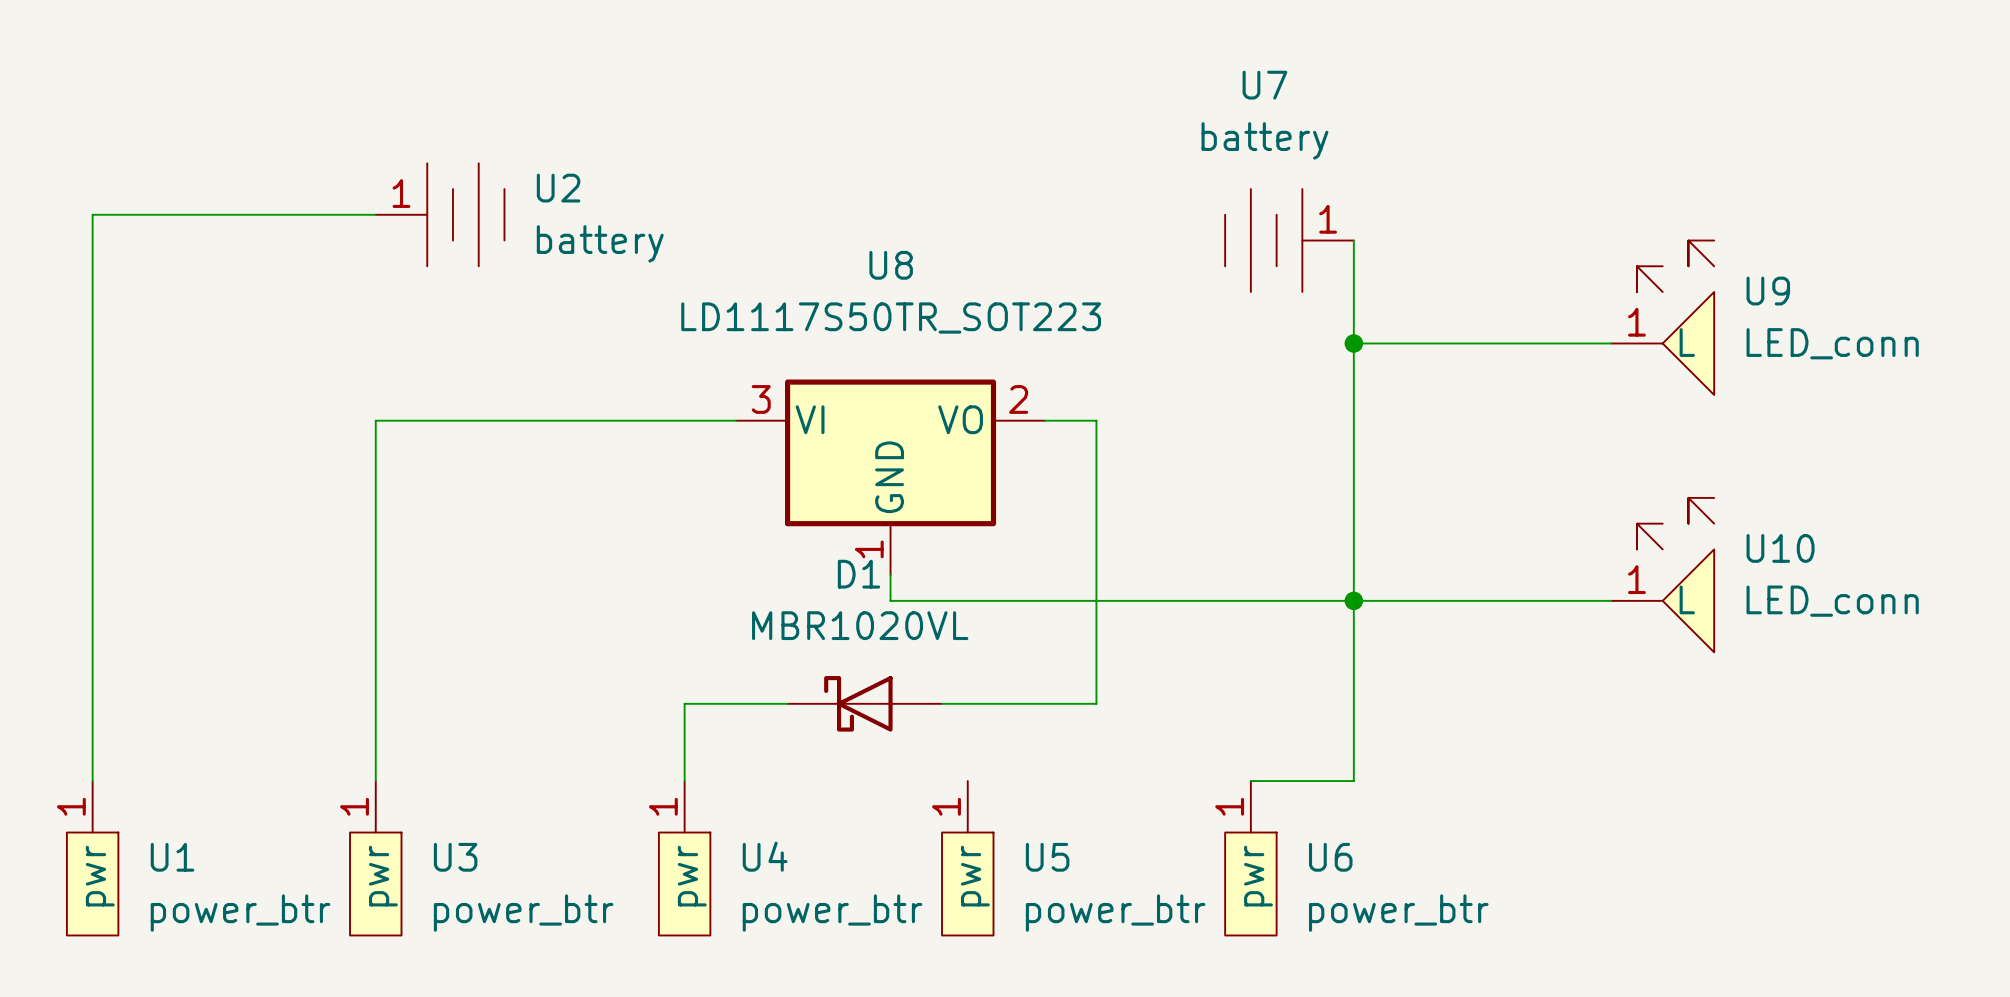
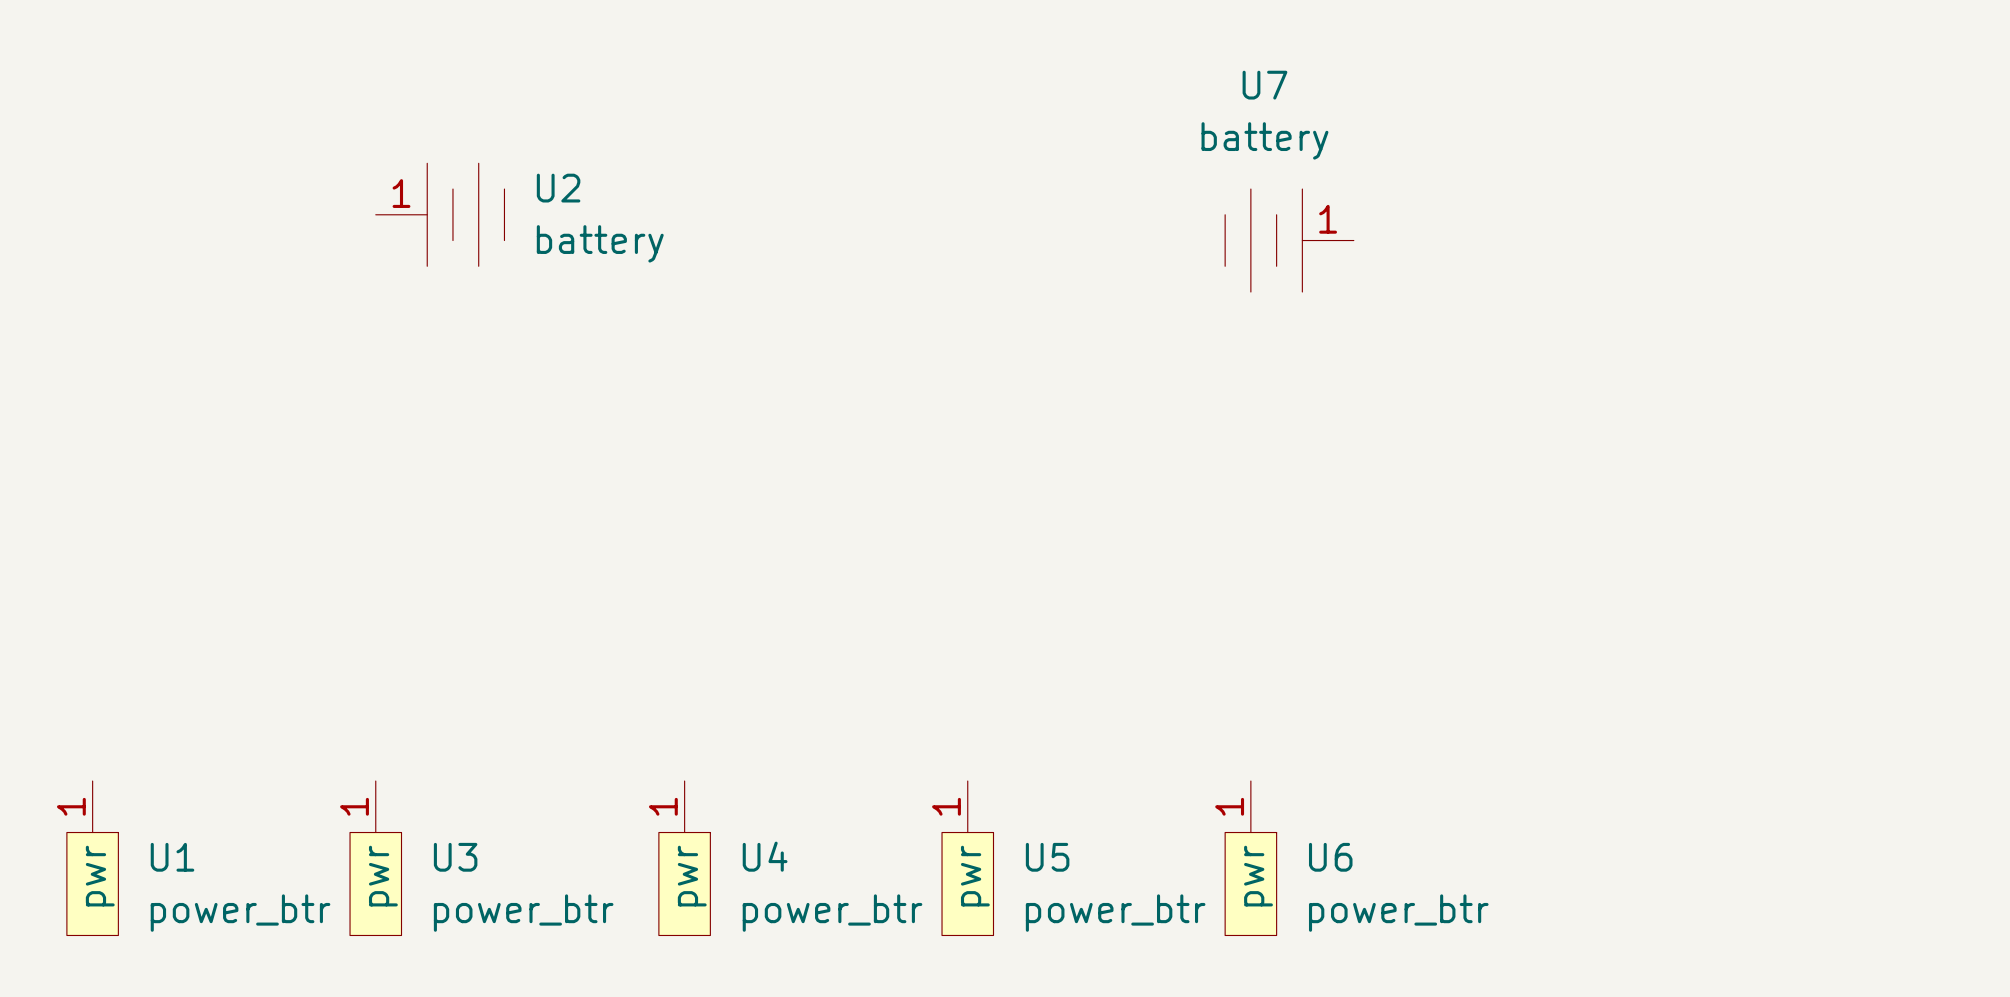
wire: (375, 214) (92, 214) (92, 781) -> none
wire: (1353, 240) (1353, 781) (1250, 781) -> none
U9: LED_conn (1662, 317) -> none
wire: (1353, 343) (1611, 343) -> none
junction: (1353, 343) -> none
wire: (736, 420) (375, 420) (375, 781) -> none
wire: (1044, 420) (1096, 420) (1096, 703) (942, 703) -> none
U8: LD1117S50TR_SOT223 (890, 477) -> none
wire: (890, 575) (890, 600) (1611, 600) -> none
U10: LED_conn (1662, 575) -> none
junction: (1353, 600) -> none
wire: (787, 703) (684, 703) (684, 781) -> none
D1: MBR1020VL (864, 703) -> none

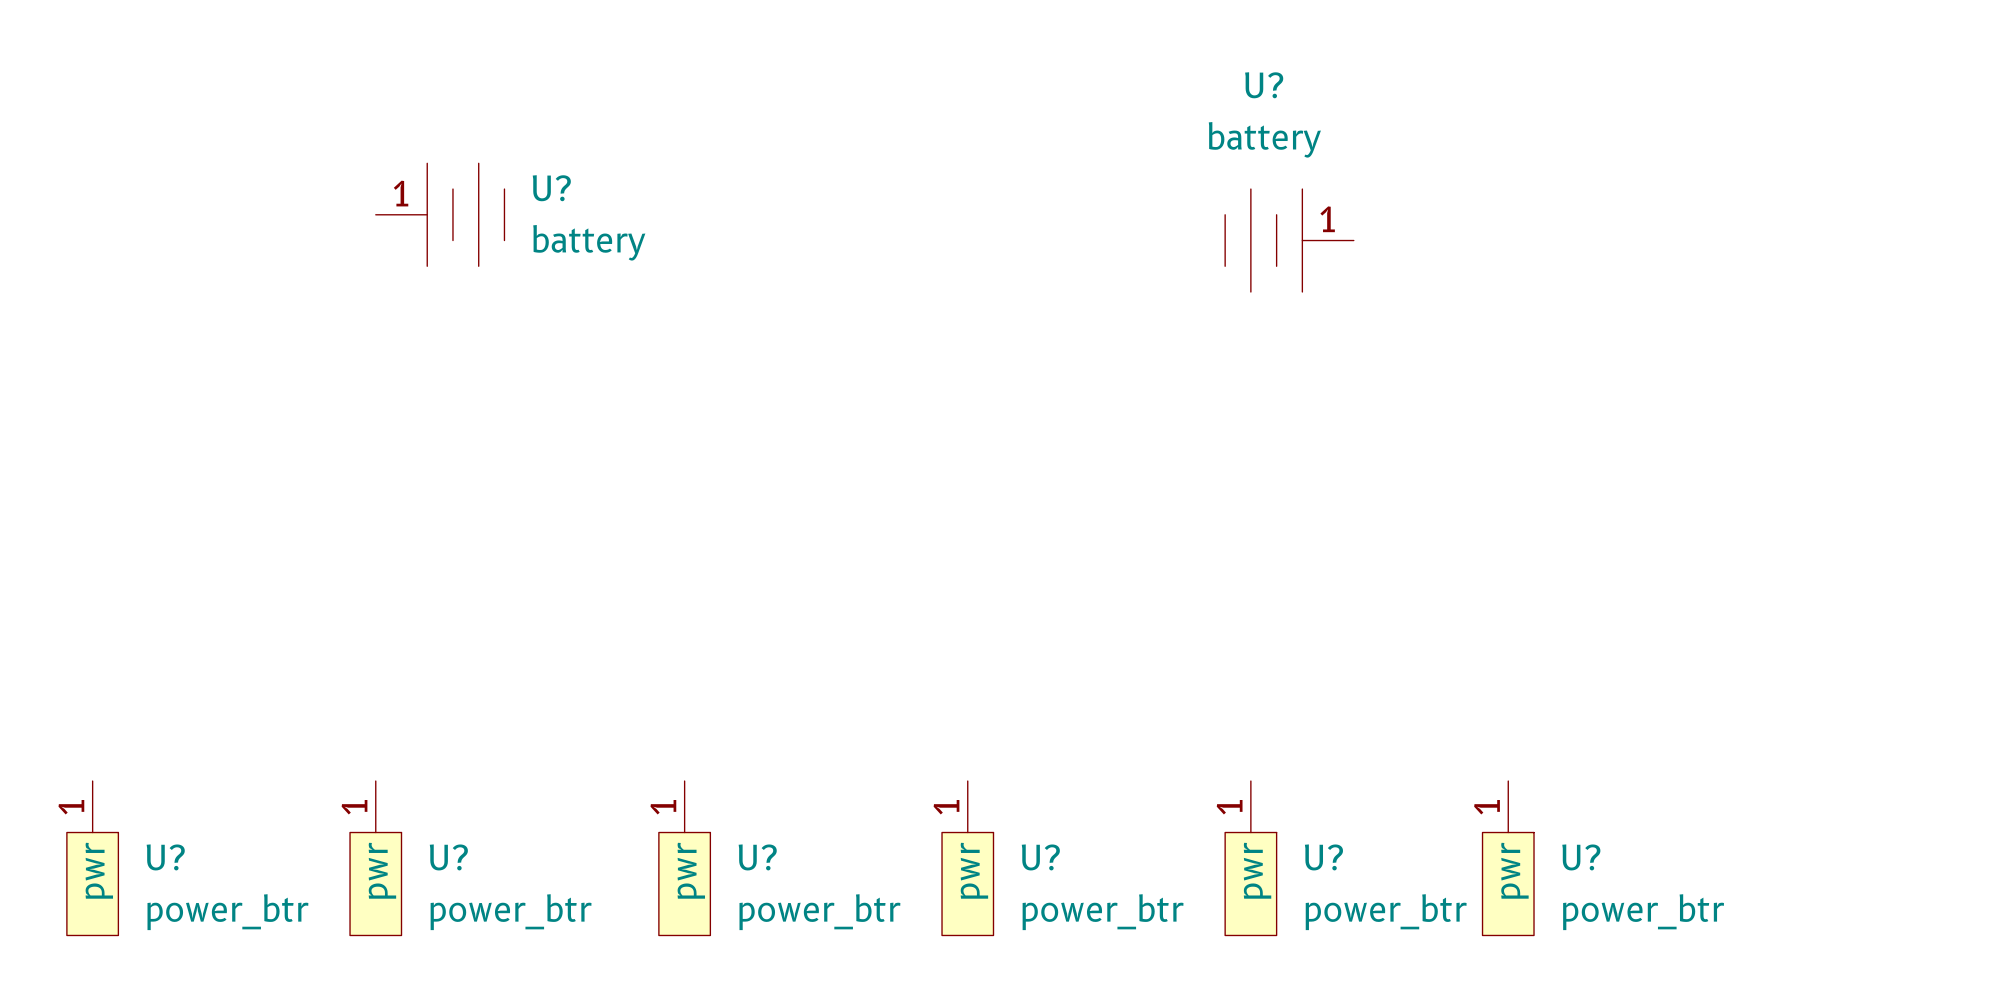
U7 name: U7 (1264, 85) -> U? (1264, 85)
U2 name: U2 (558, 188) -> U? (551, 188)
U4 name: U4 (765, 856) -> U? (757, 857)
U1 name: U1 (172, 857) -> U? (165, 857)
U3 name: U3 (455, 857) -> U? (448, 857)
U5 name: U5 (1047, 857) -> U? (1040, 857)
U6 name: U6 (1330, 857) -> U? (1323, 857)
U?: none -> power_btr (1508, 858)

